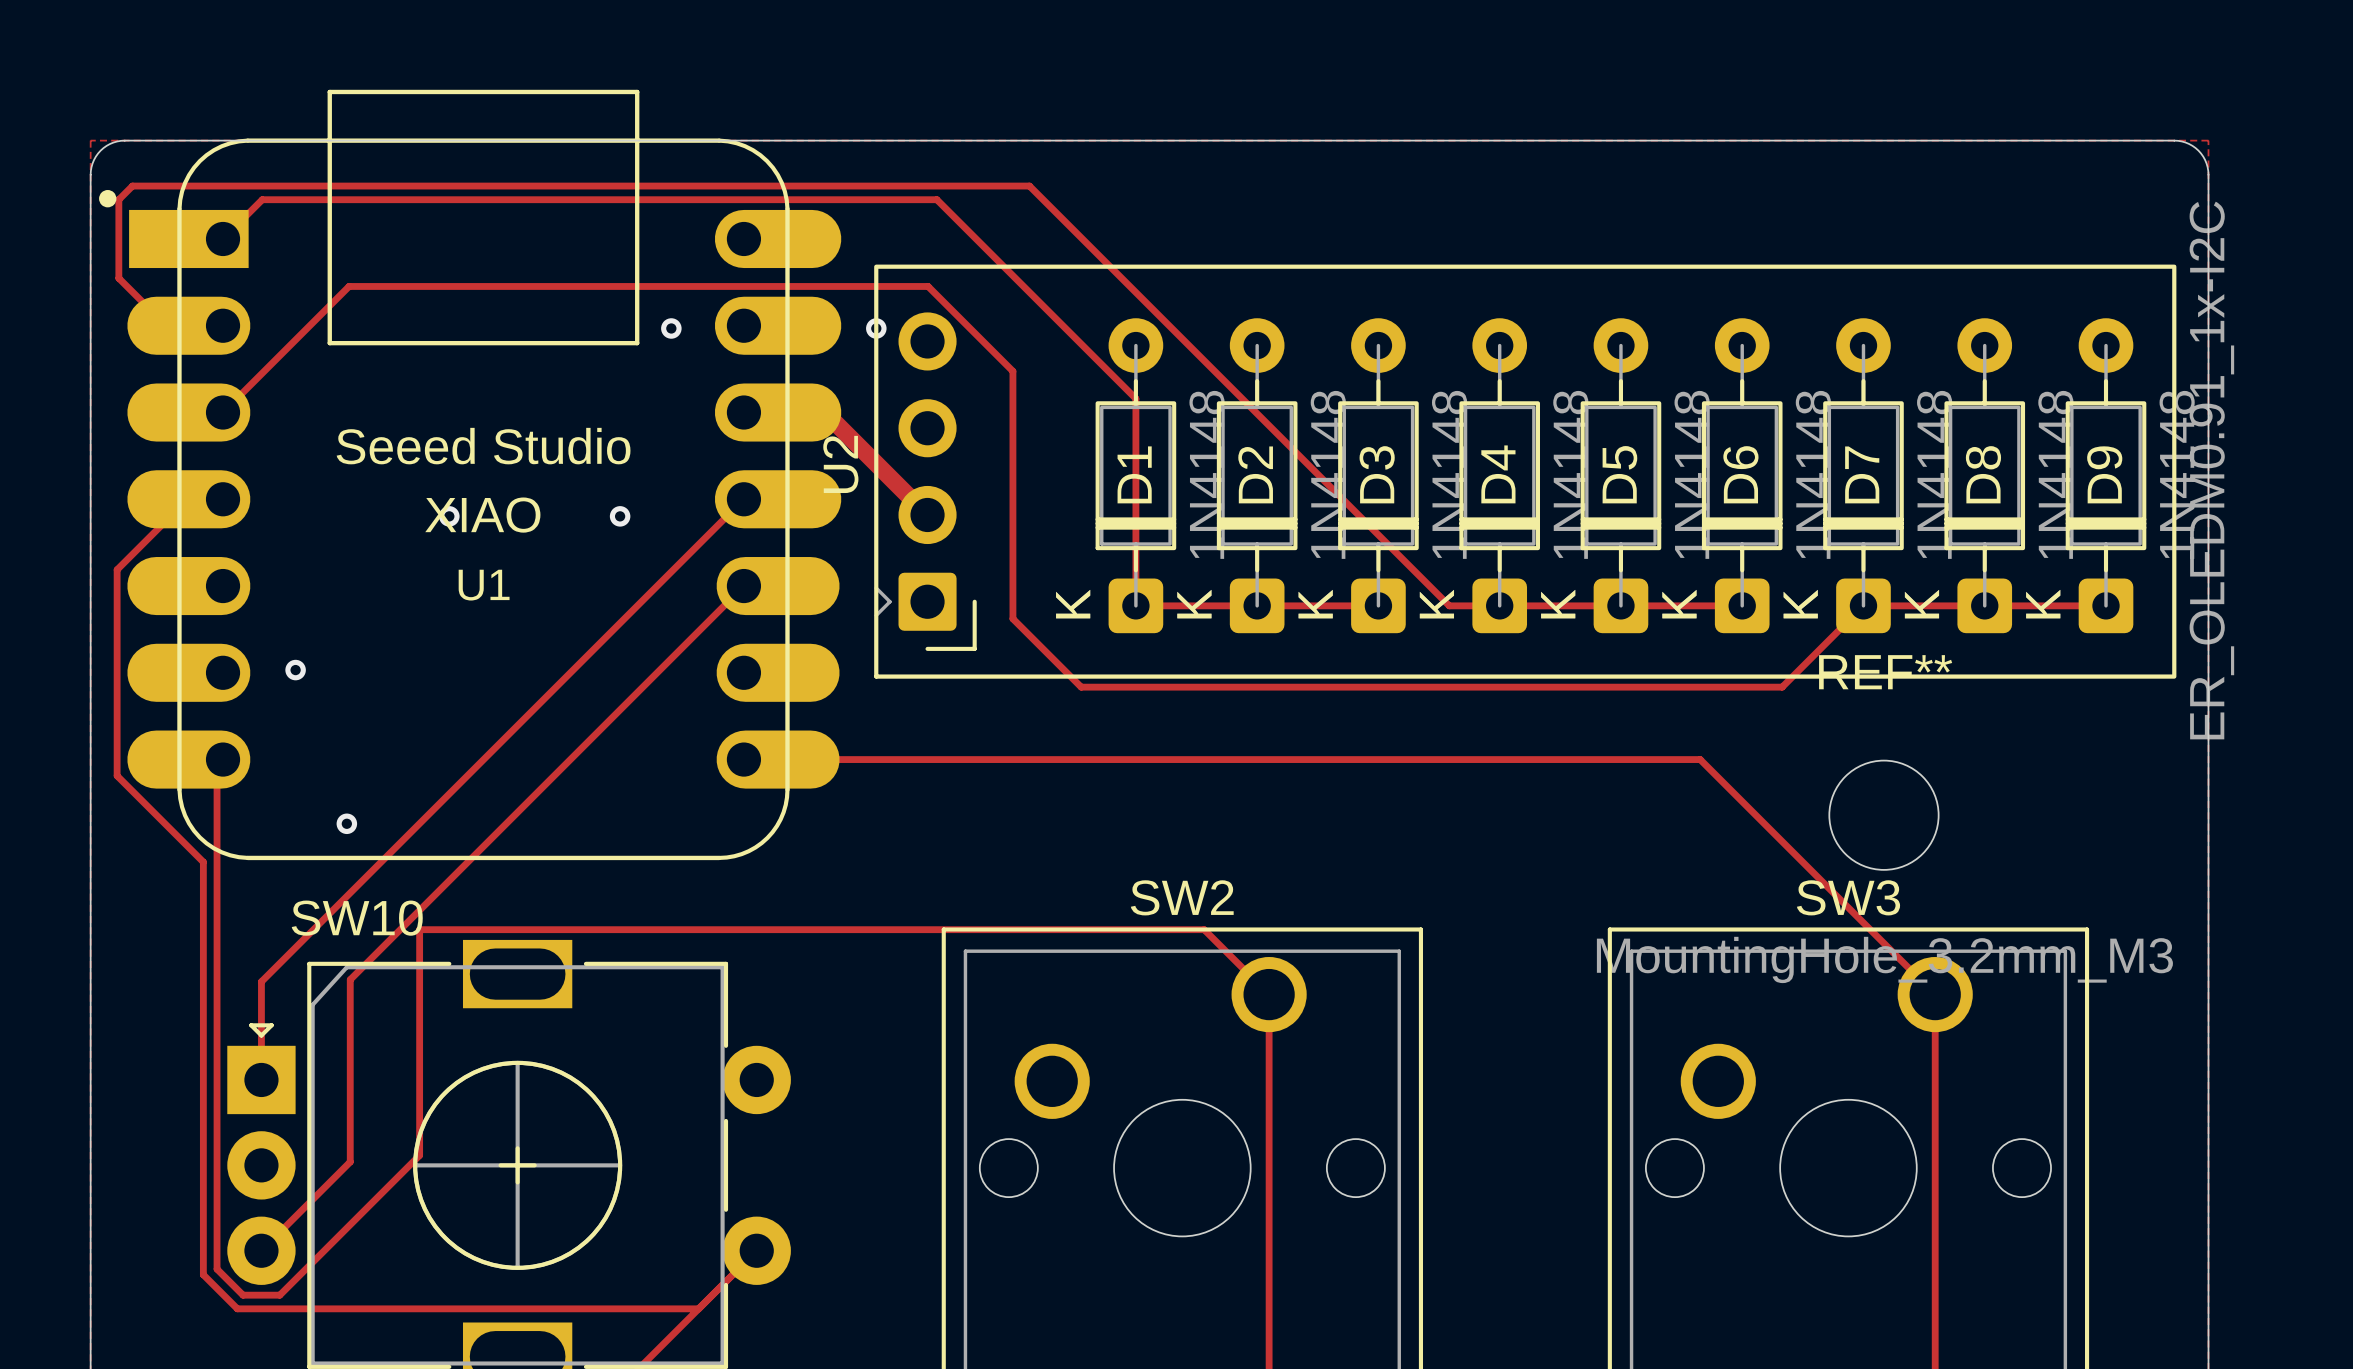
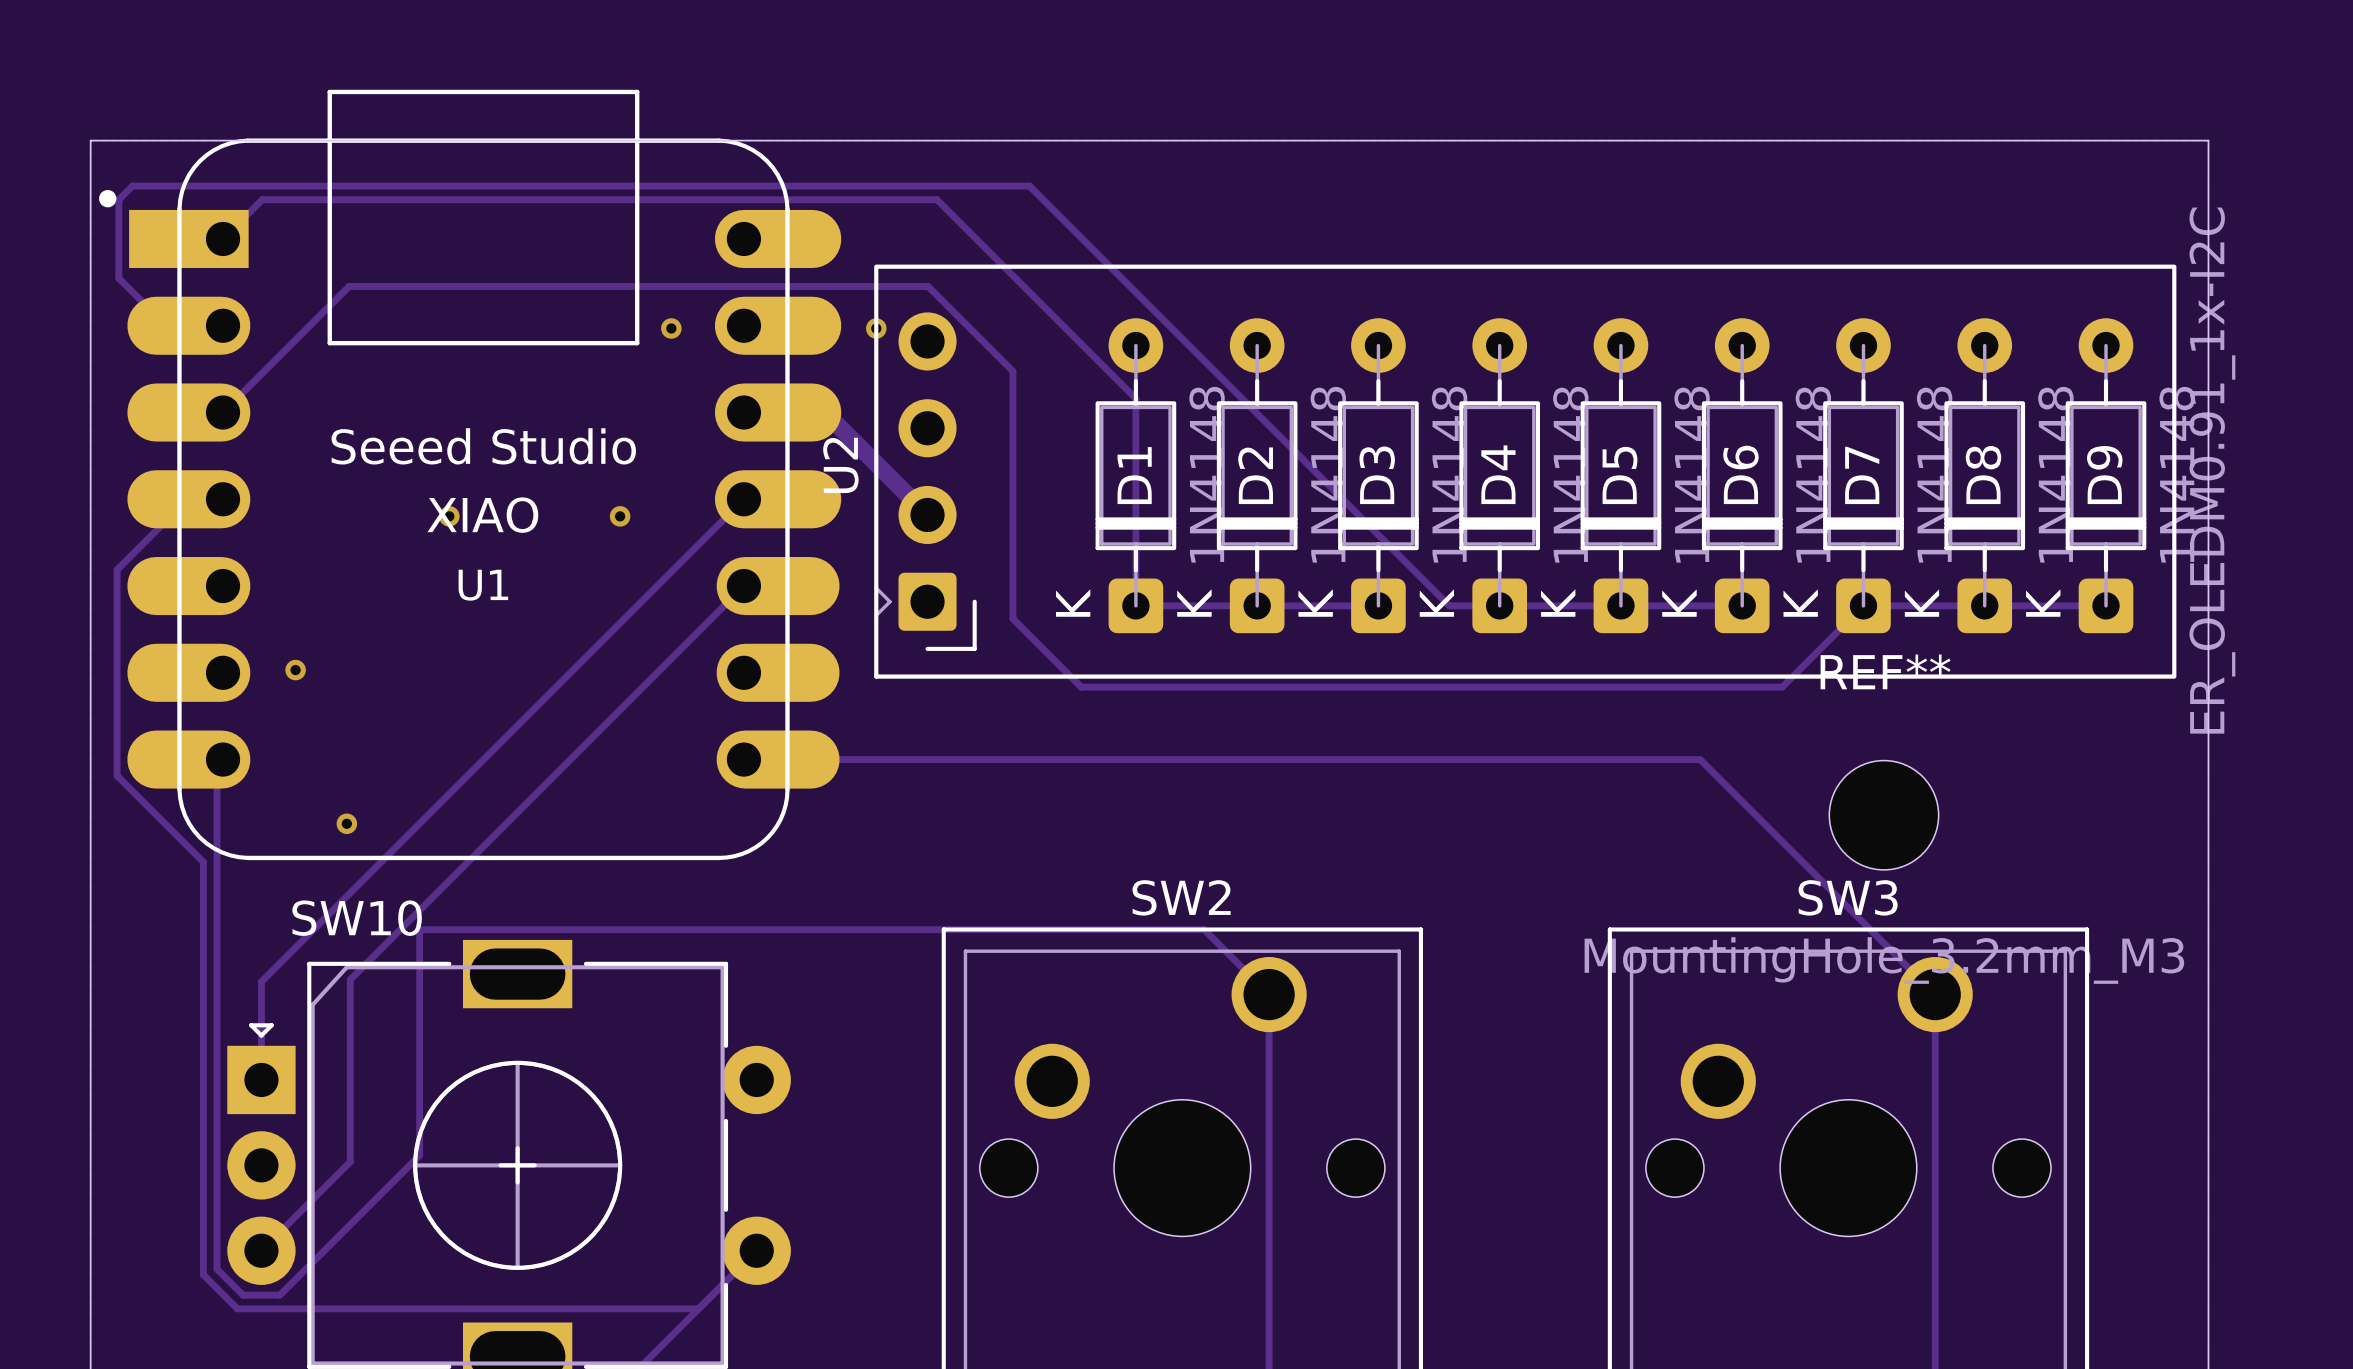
board edge: (124, 140) (109, 143) (100, 150) (92, 163) (90, 174) -> (124, 140) (90, 140) (90, 174)
board edge: (2174, 140) (2189, 143) (2198, 150) (2206, 163) (2208, 174) -> (2174, 140) (2208, 140) (2208, 174)

